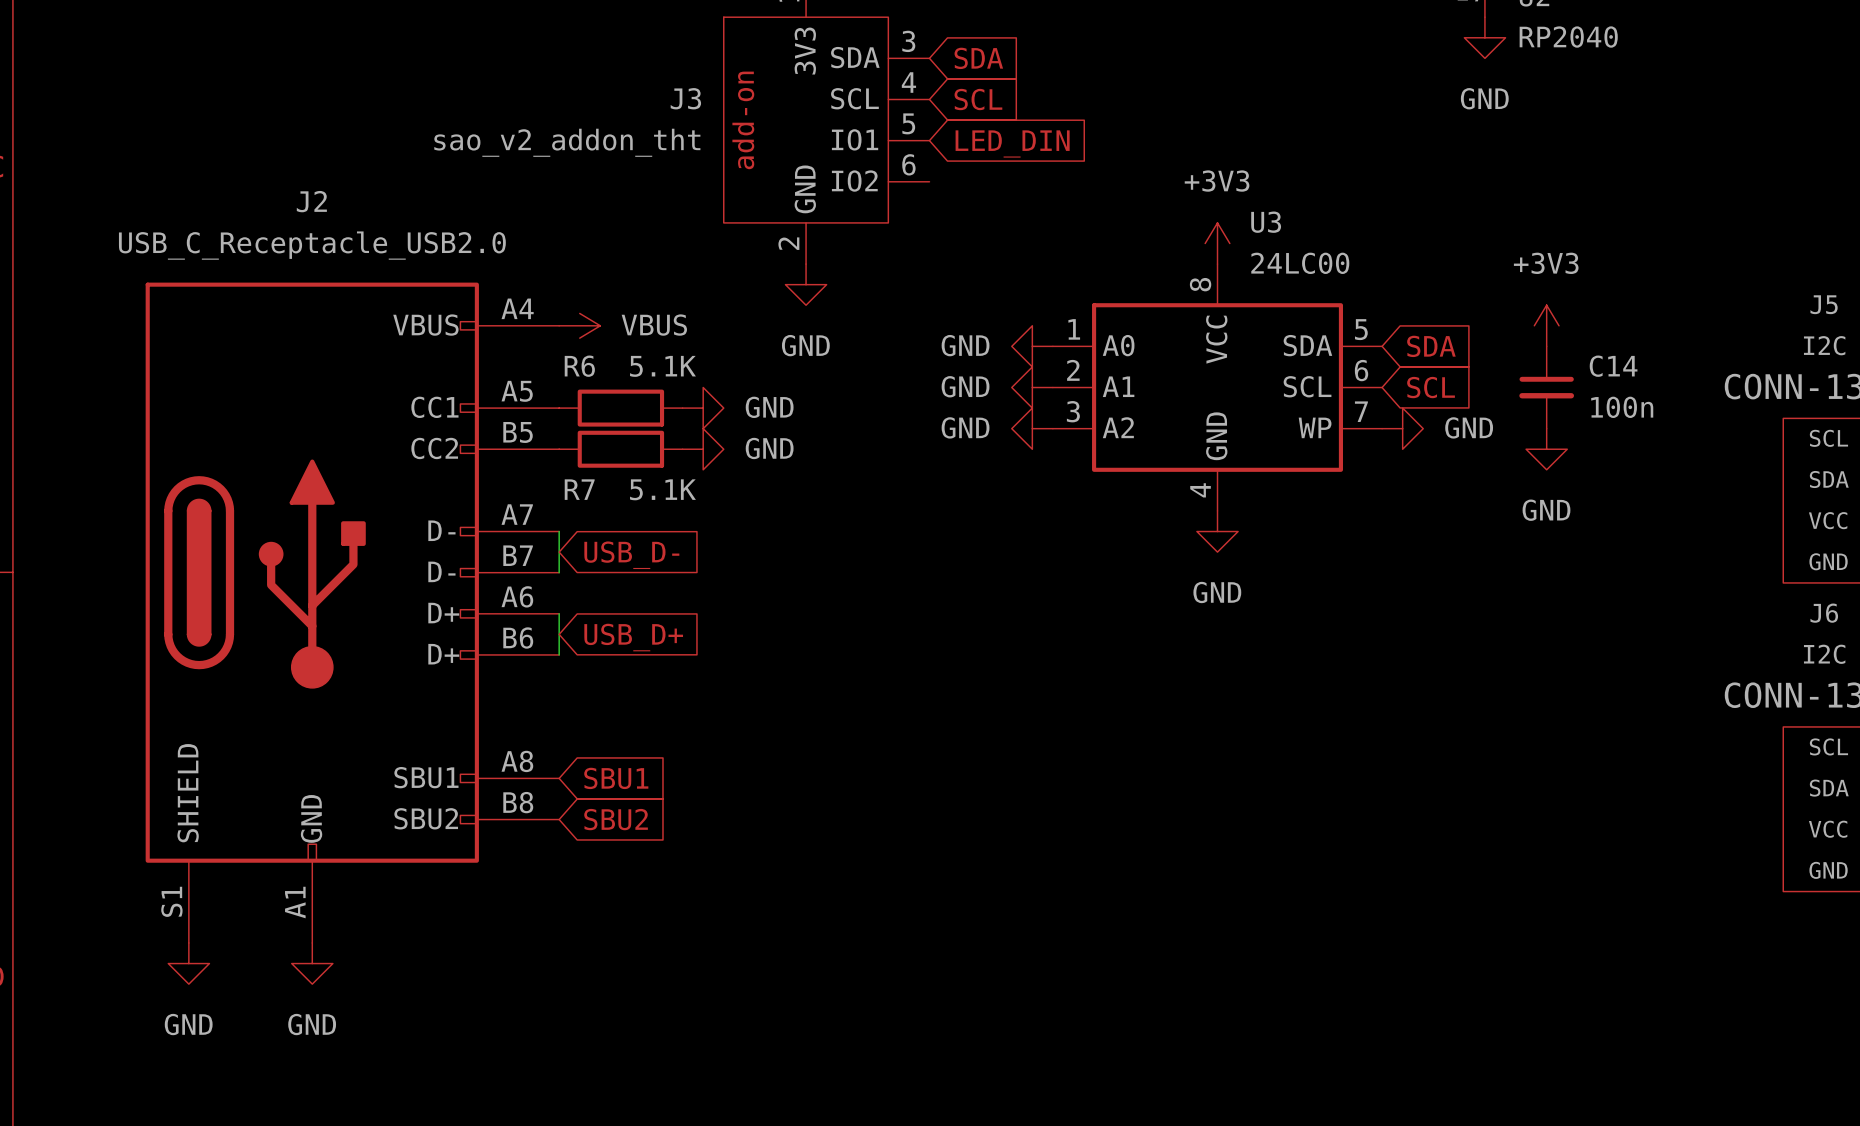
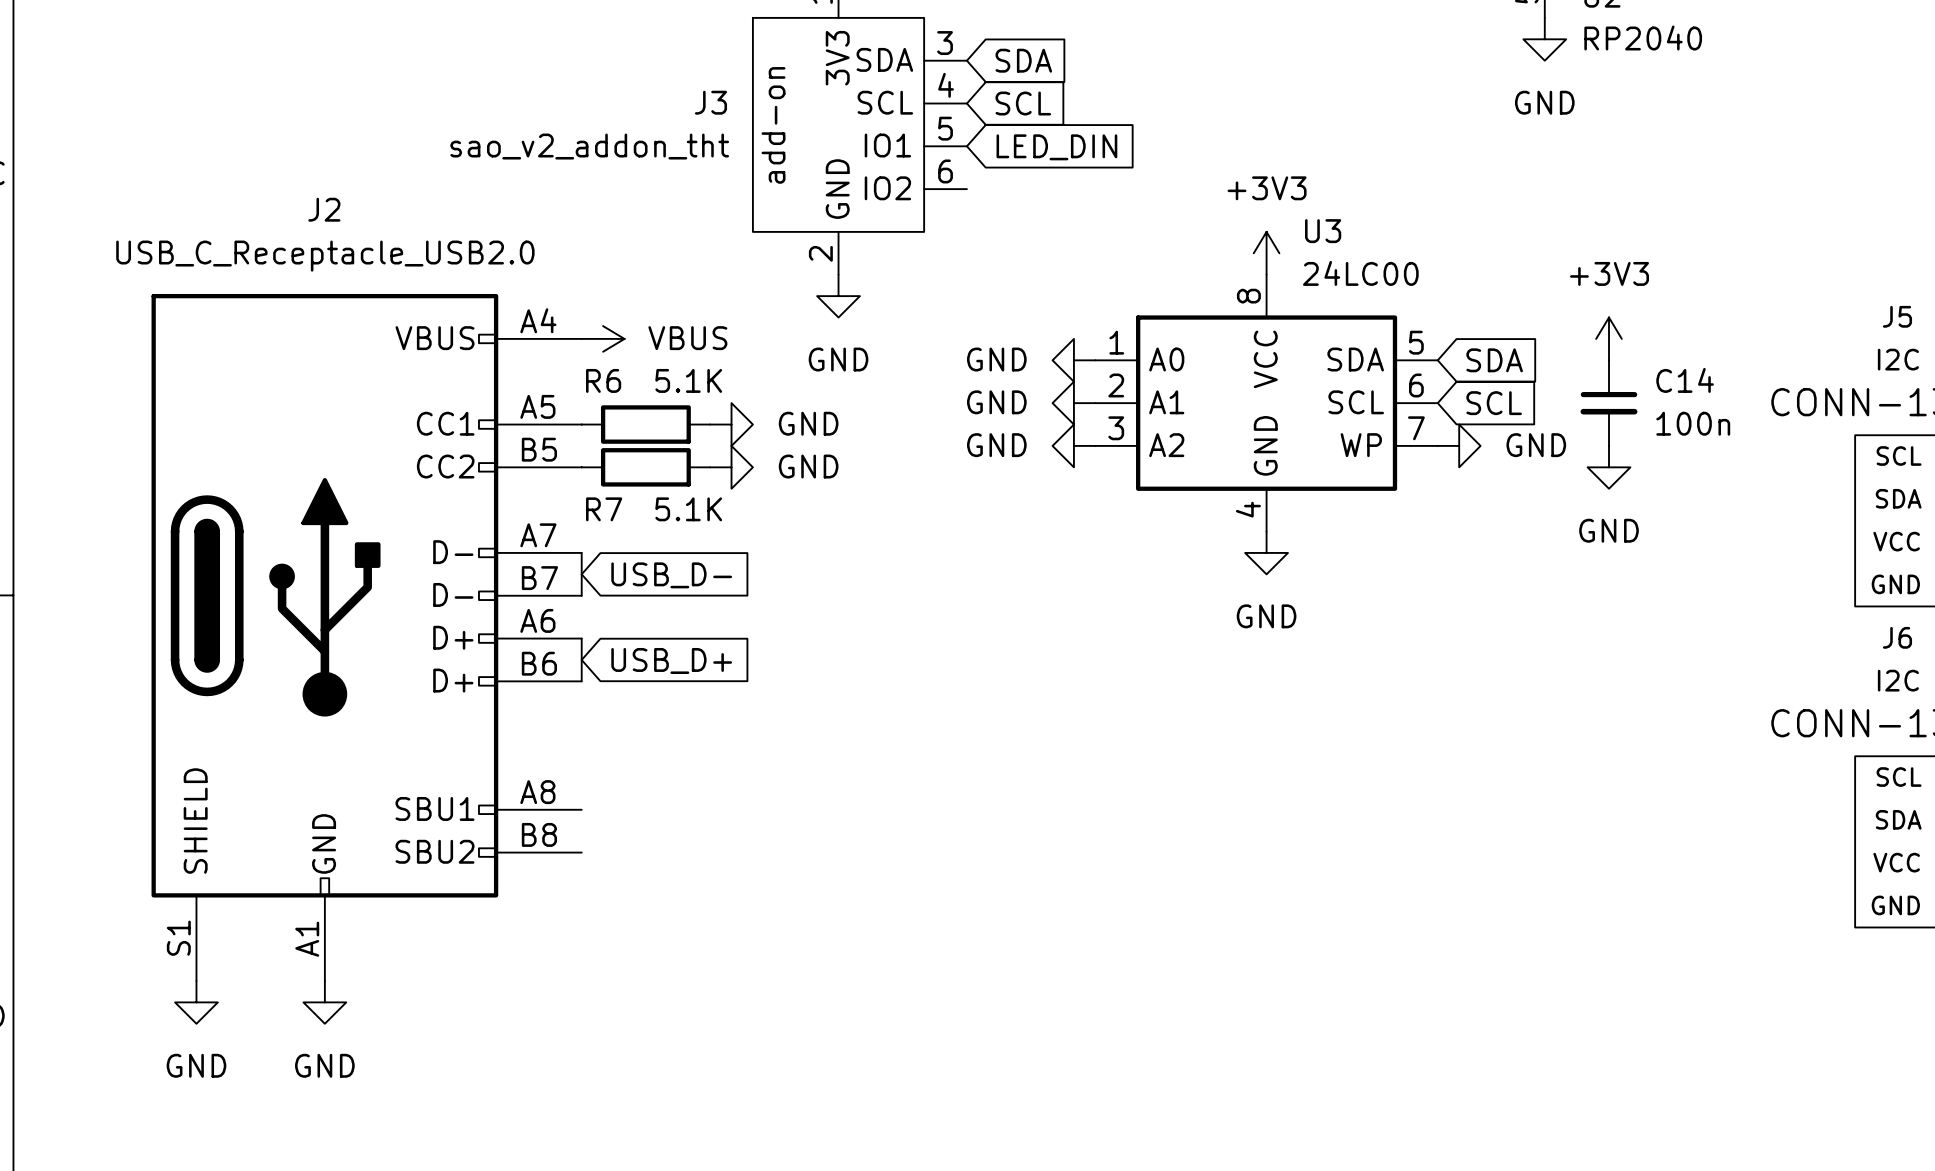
global label: SBU1 (616, 778) -> none
global label: SBU2 (616, 819) -> none

